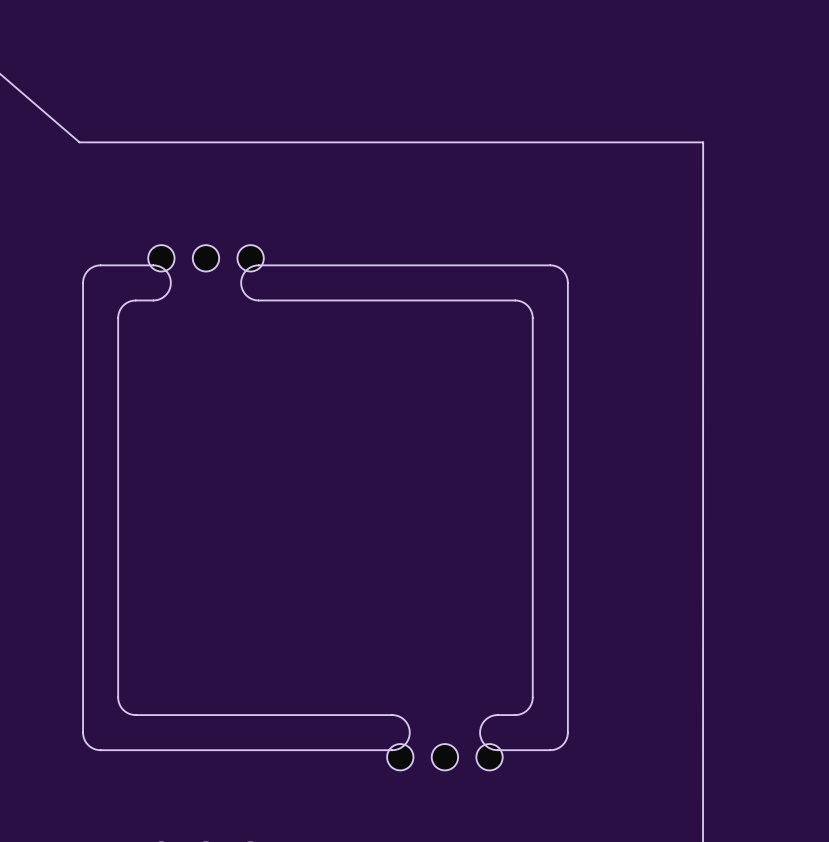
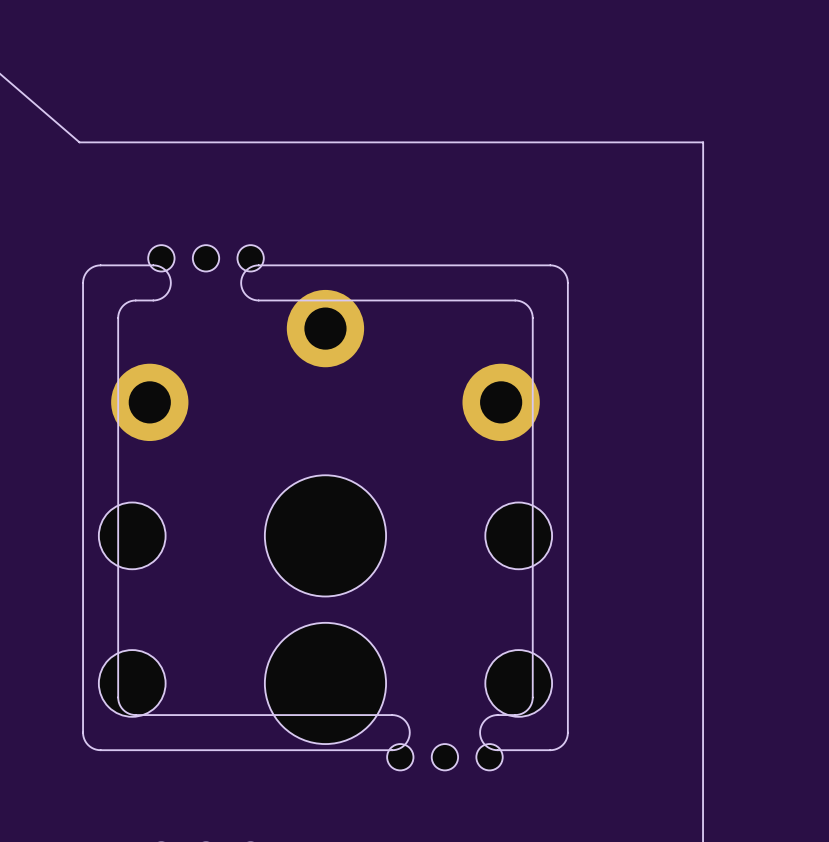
part footprint: [82, 245, 569, 771] -> [82, 245, 569, 771]

